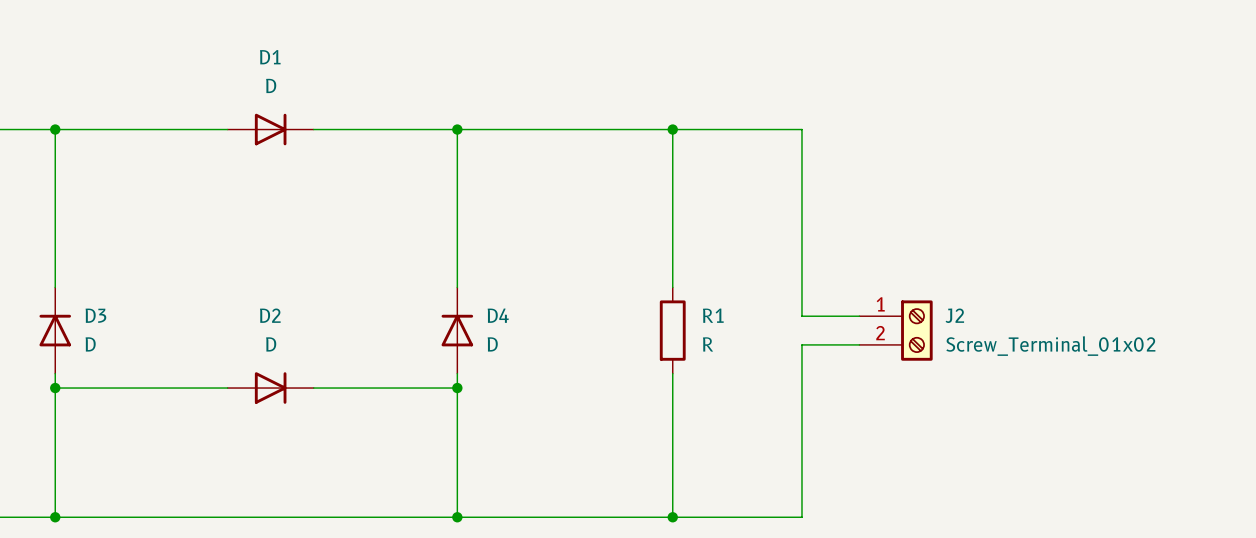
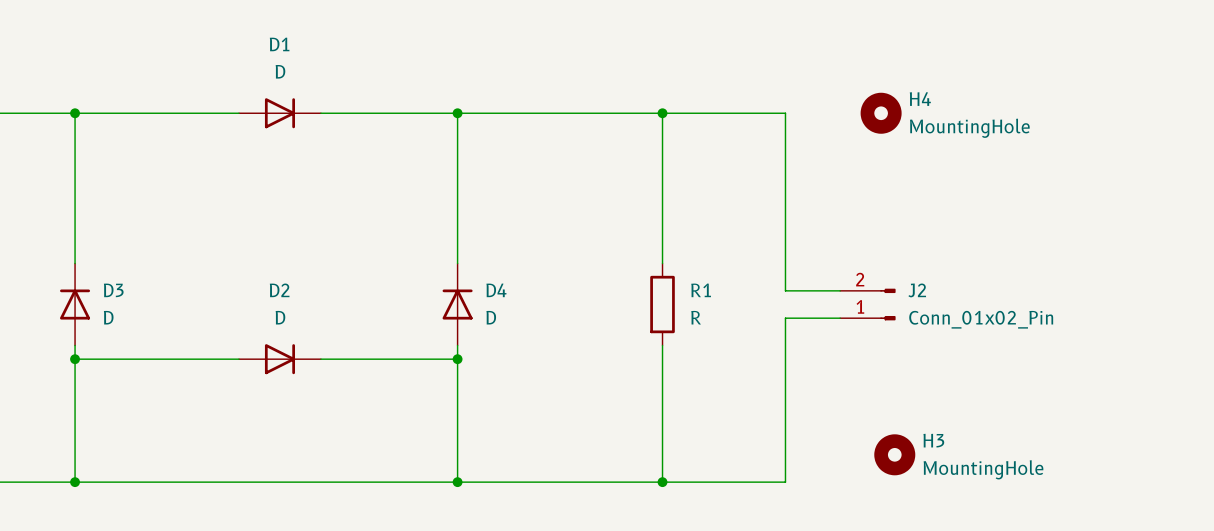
H4: none -> MountingHole (881, 113)
J2 symbol: [859, 300, 933, 361] -> [840, 288, 896, 321]
J2 value: Screw_Terminal_01x02 (1050, 346) -> Conn_01x02_Pin (981, 319)
H3: none -> MountingHole (894, 454)

